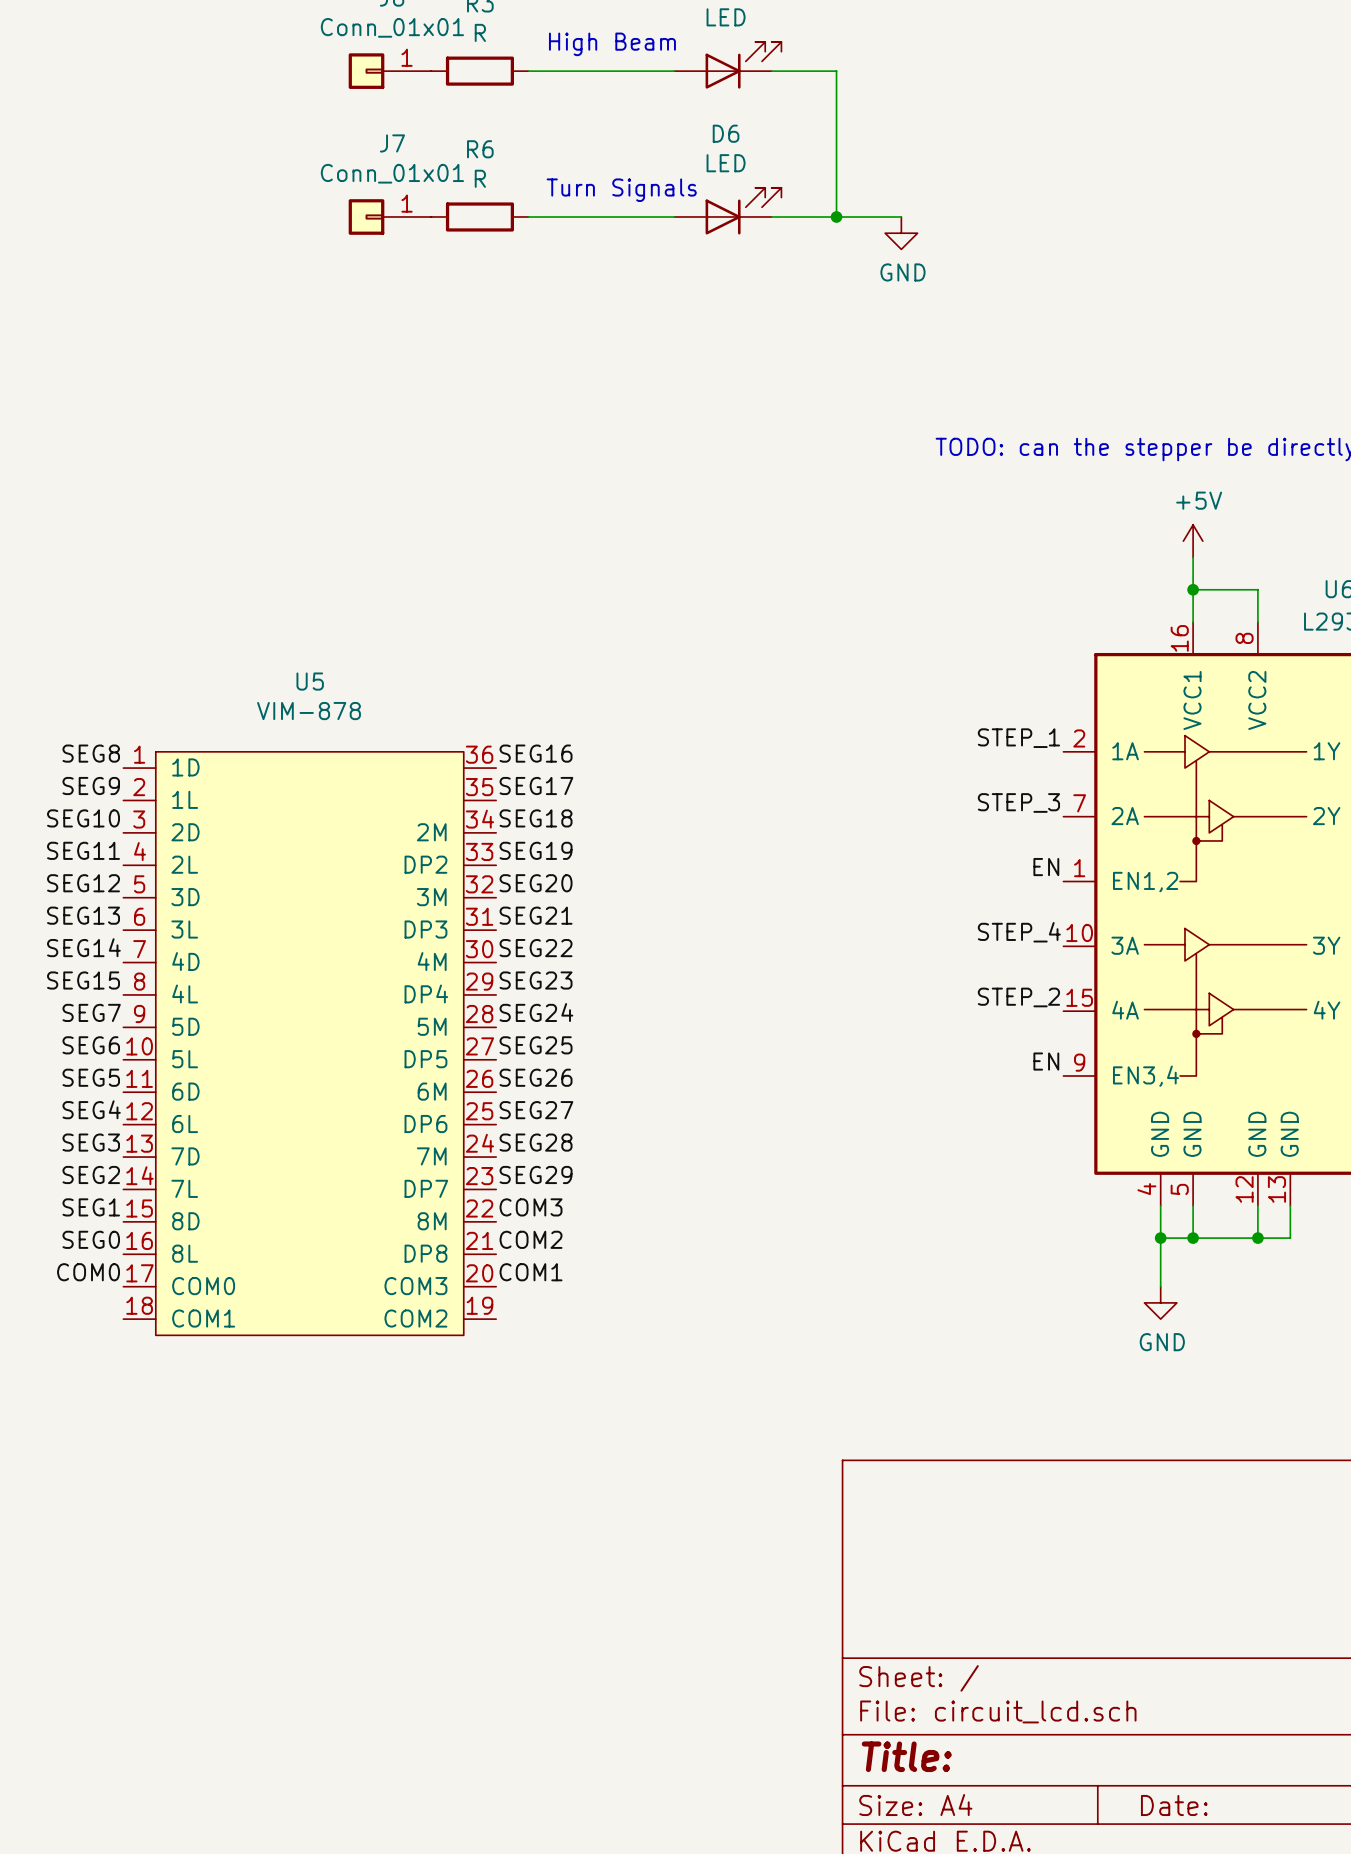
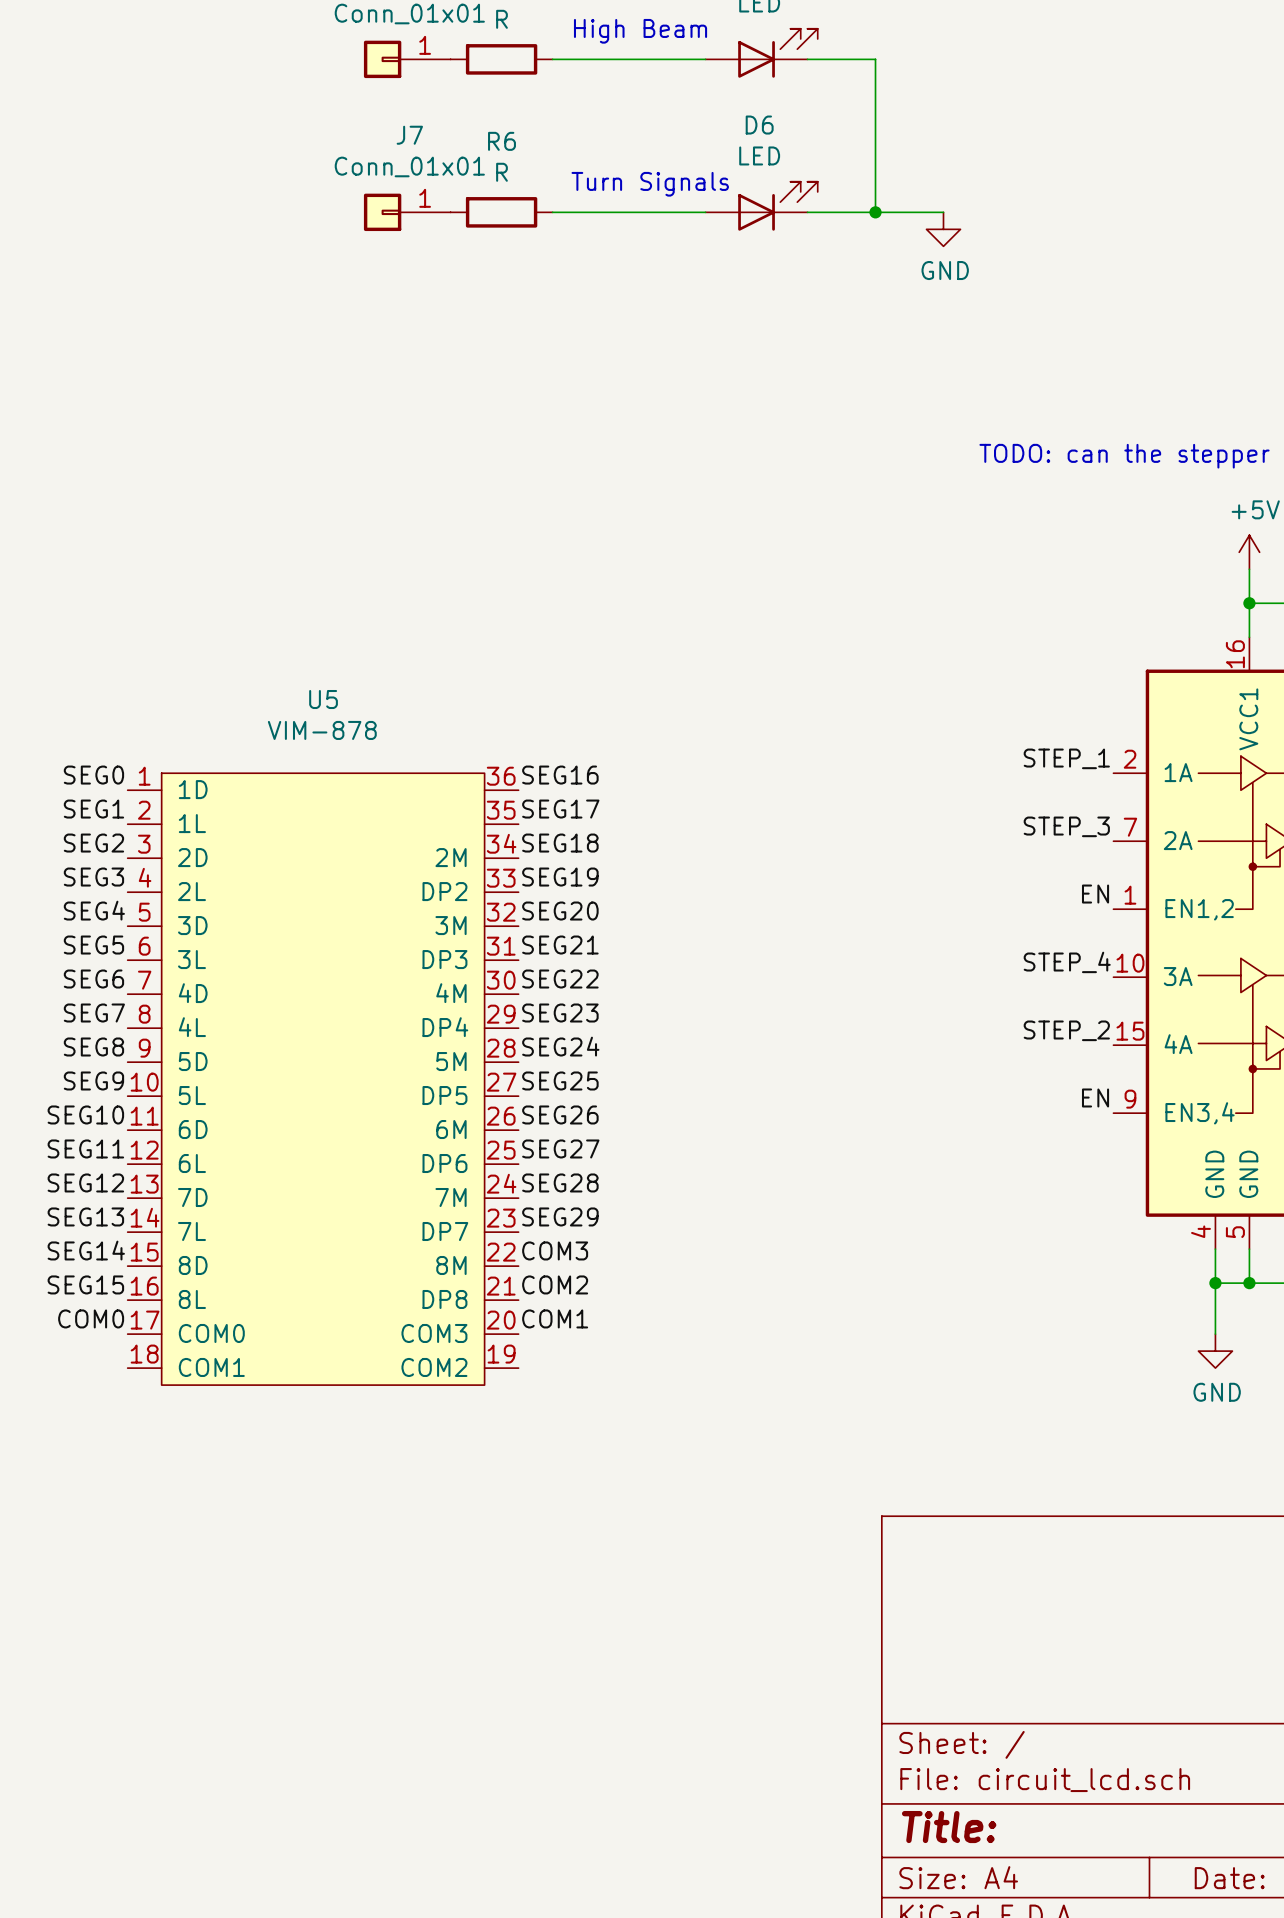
label: SEG8 (91, 753) -> SEG0 (93, 775)
label: SEG9 (91, 786) -> SEG1 (93, 809)
label: SEG10 (83, 818) -> SEG2 (93, 843)
label: SEG11 (83, 850) -> SEG3 (93, 877)
label: SEG12 (83, 883) -> SEG4 (94, 910)
label: SEG13 (83, 915) -> SEG5 (93, 945)
label: SEG14 (83, 947) -> SEG6 (93, 979)
label: SEG15 (83, 980) -> SEG7 (94, 1013)
label: SEG7 (91, 1012) -> SEG8 (93, 1047)
label: SEG6 (91, 1045) -> SEG9 (93, 1080)
label: SEG5 (91, 1077) -> SEG10 (85, 1114)
label: SEG4 (91, 1109) -> SEG11 (85, 1148)
label: SEG3 (91, 1142) -> SEG12 (85, 1182)
label: SEG2 (91, 1174) -> SEG13 (85, 1216)
label: SEG1 (91, 1207) -> SEG14 (86, 1250)
label: SEG0 (91, 1239) -> SEG15 (85, 1284)

